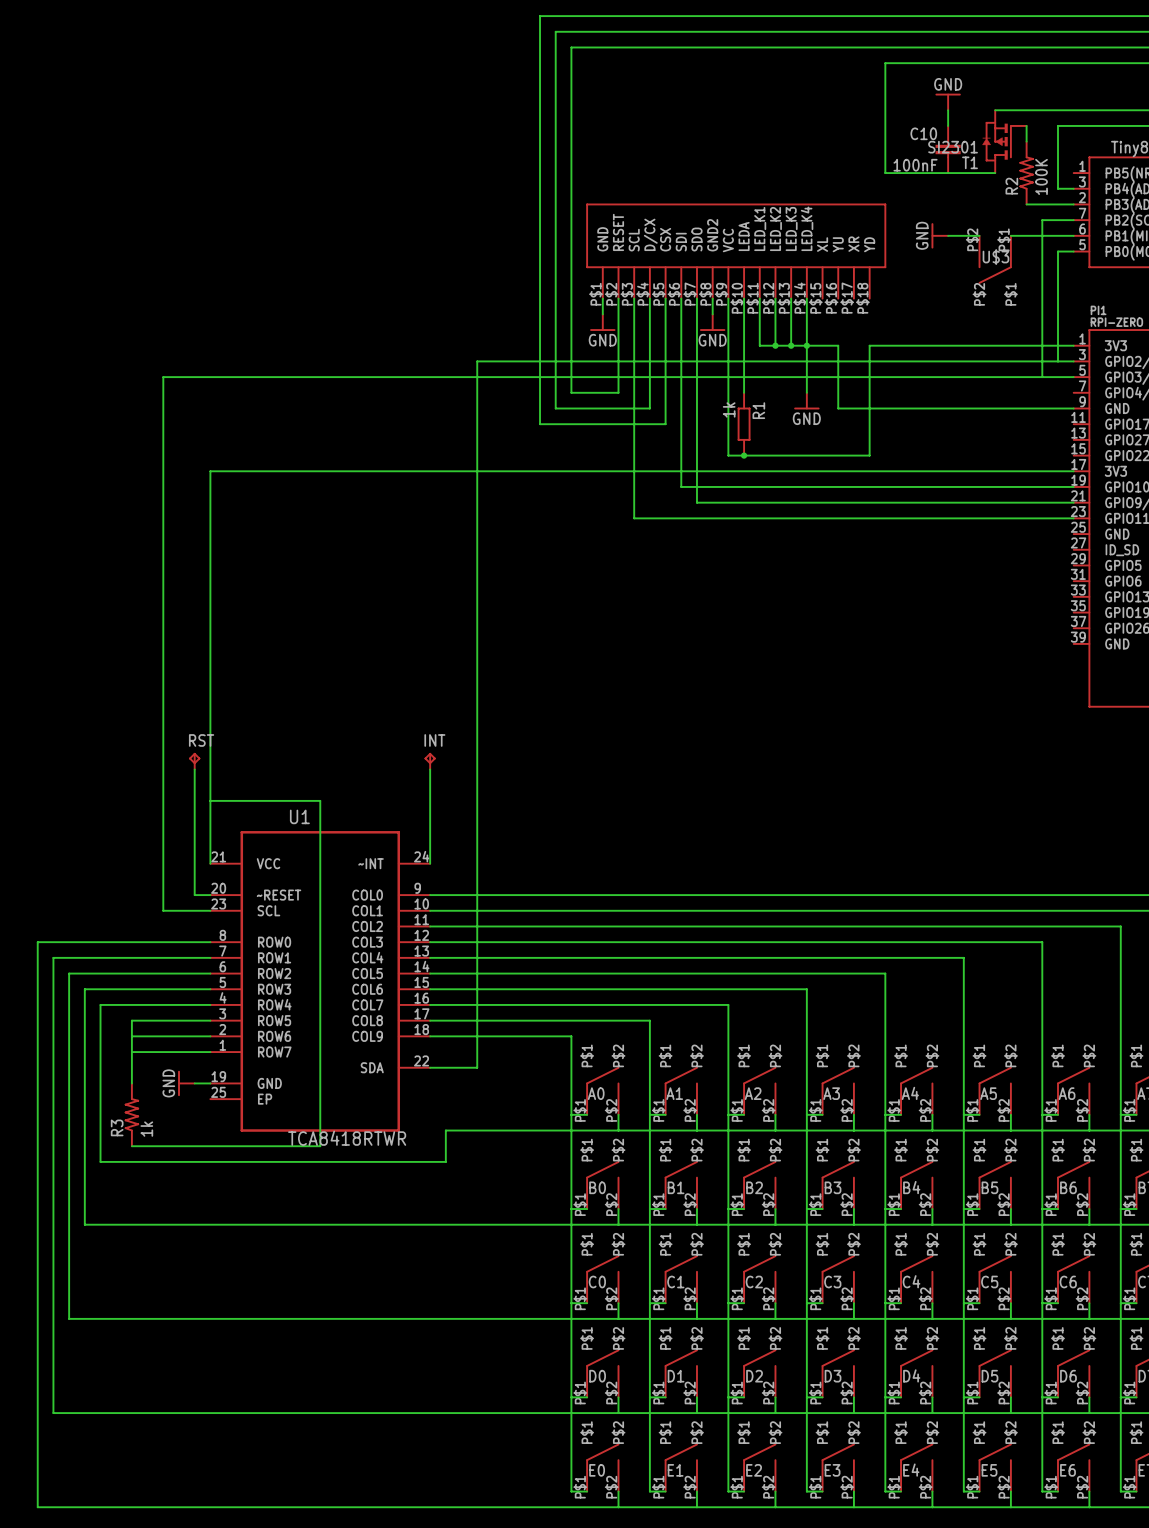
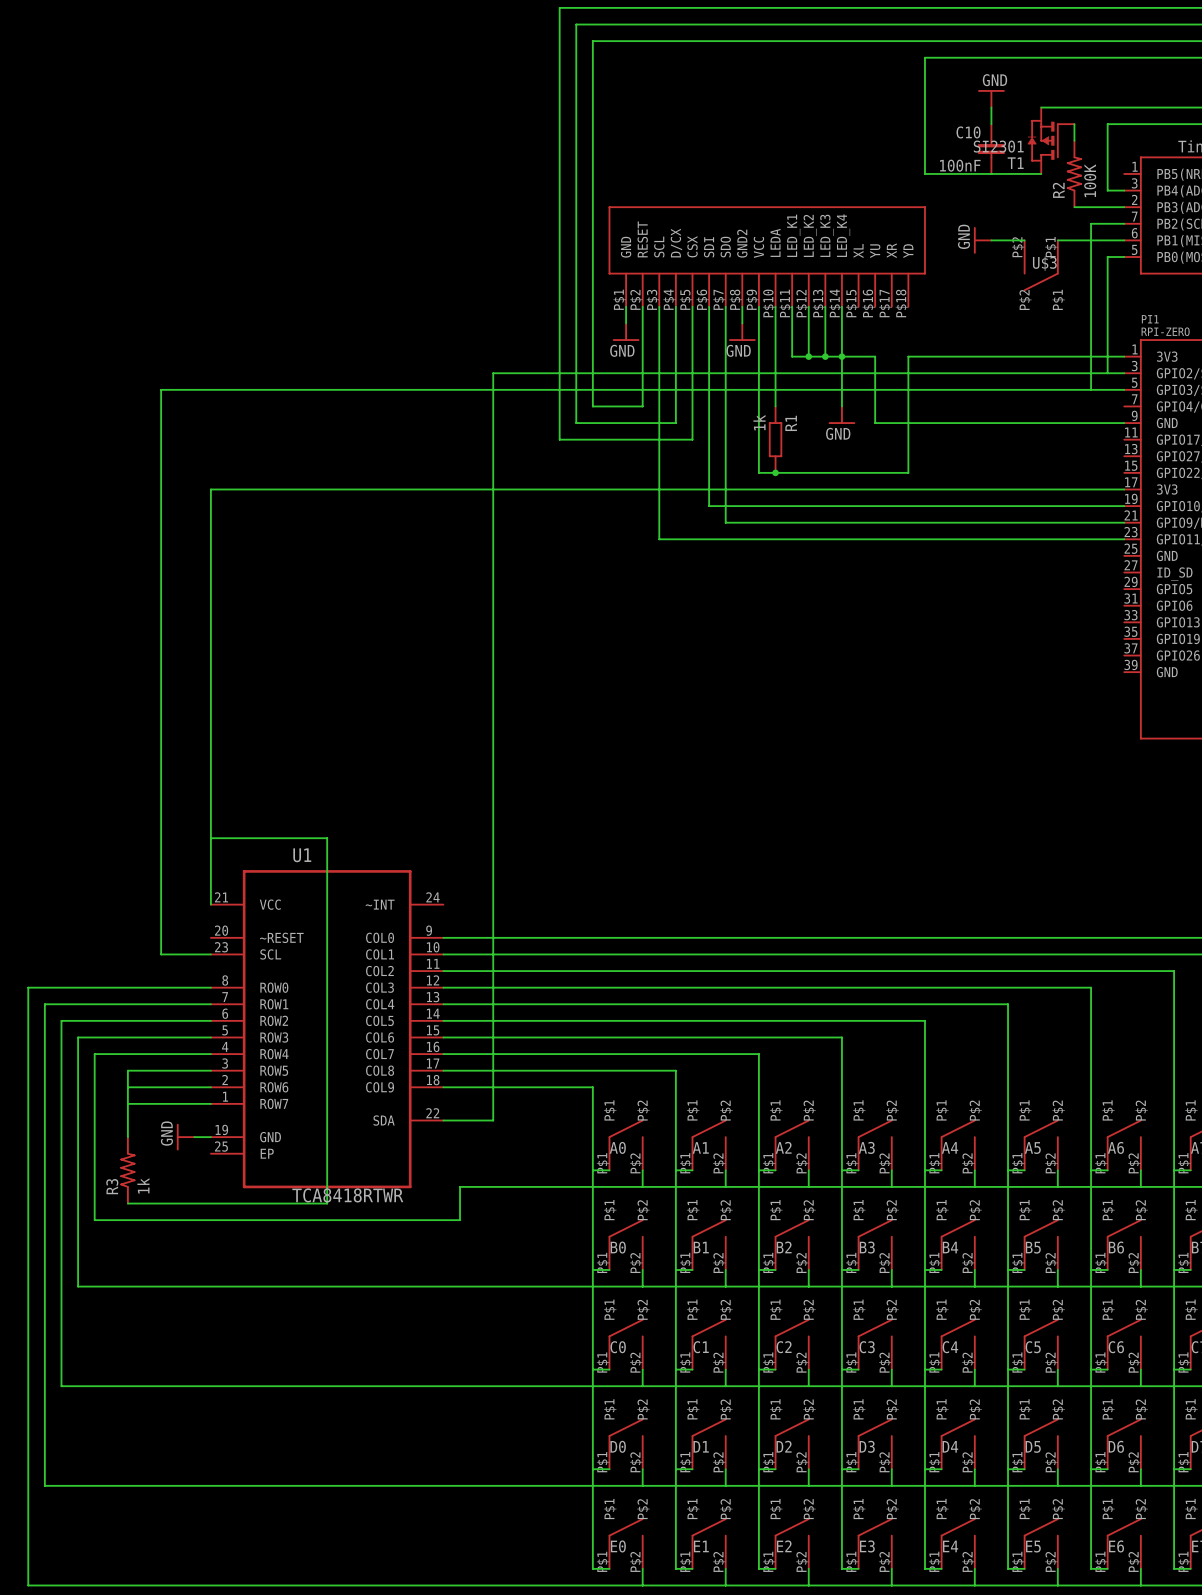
RST: (194, 761) -> none
INT: (430, 761) -> none
wire: (194, 769) (194, 895) (210, 895) -> none
wire: (430, 769) (430, 863) -> none

